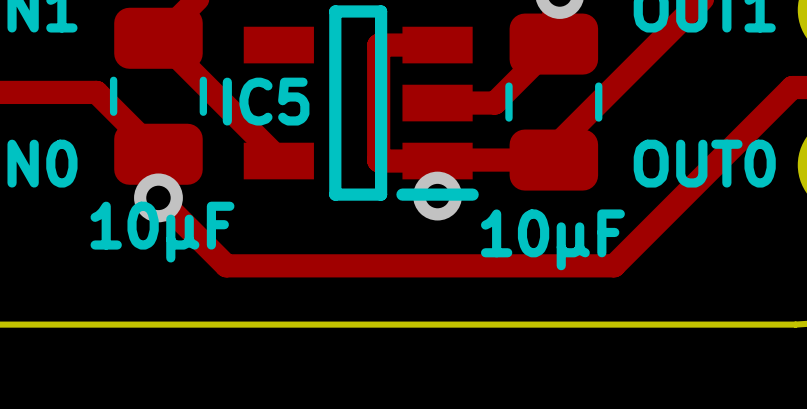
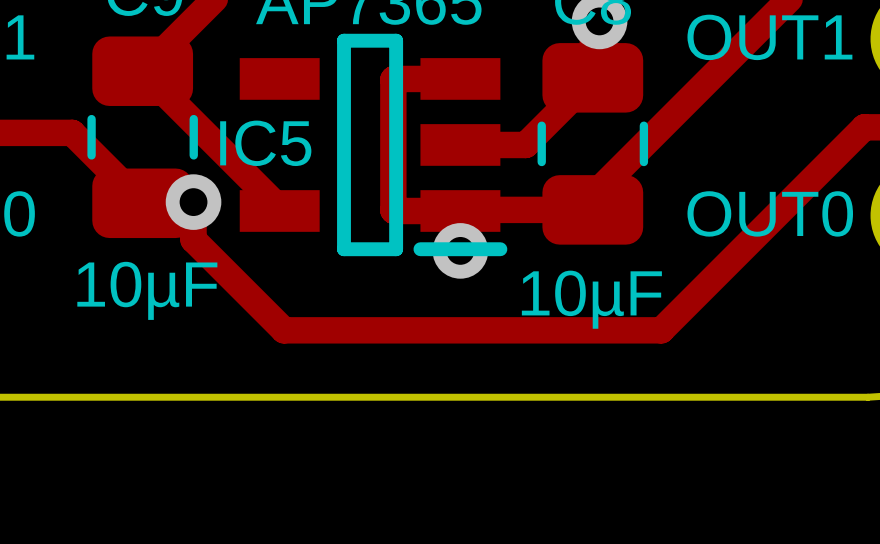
track: (158, 154) (158, 197) (226, 265) (282, 265) -> (142, 203) (193, 202) (193, 239) (284, 330)
via position: (158, 197) -> (193, 202)

